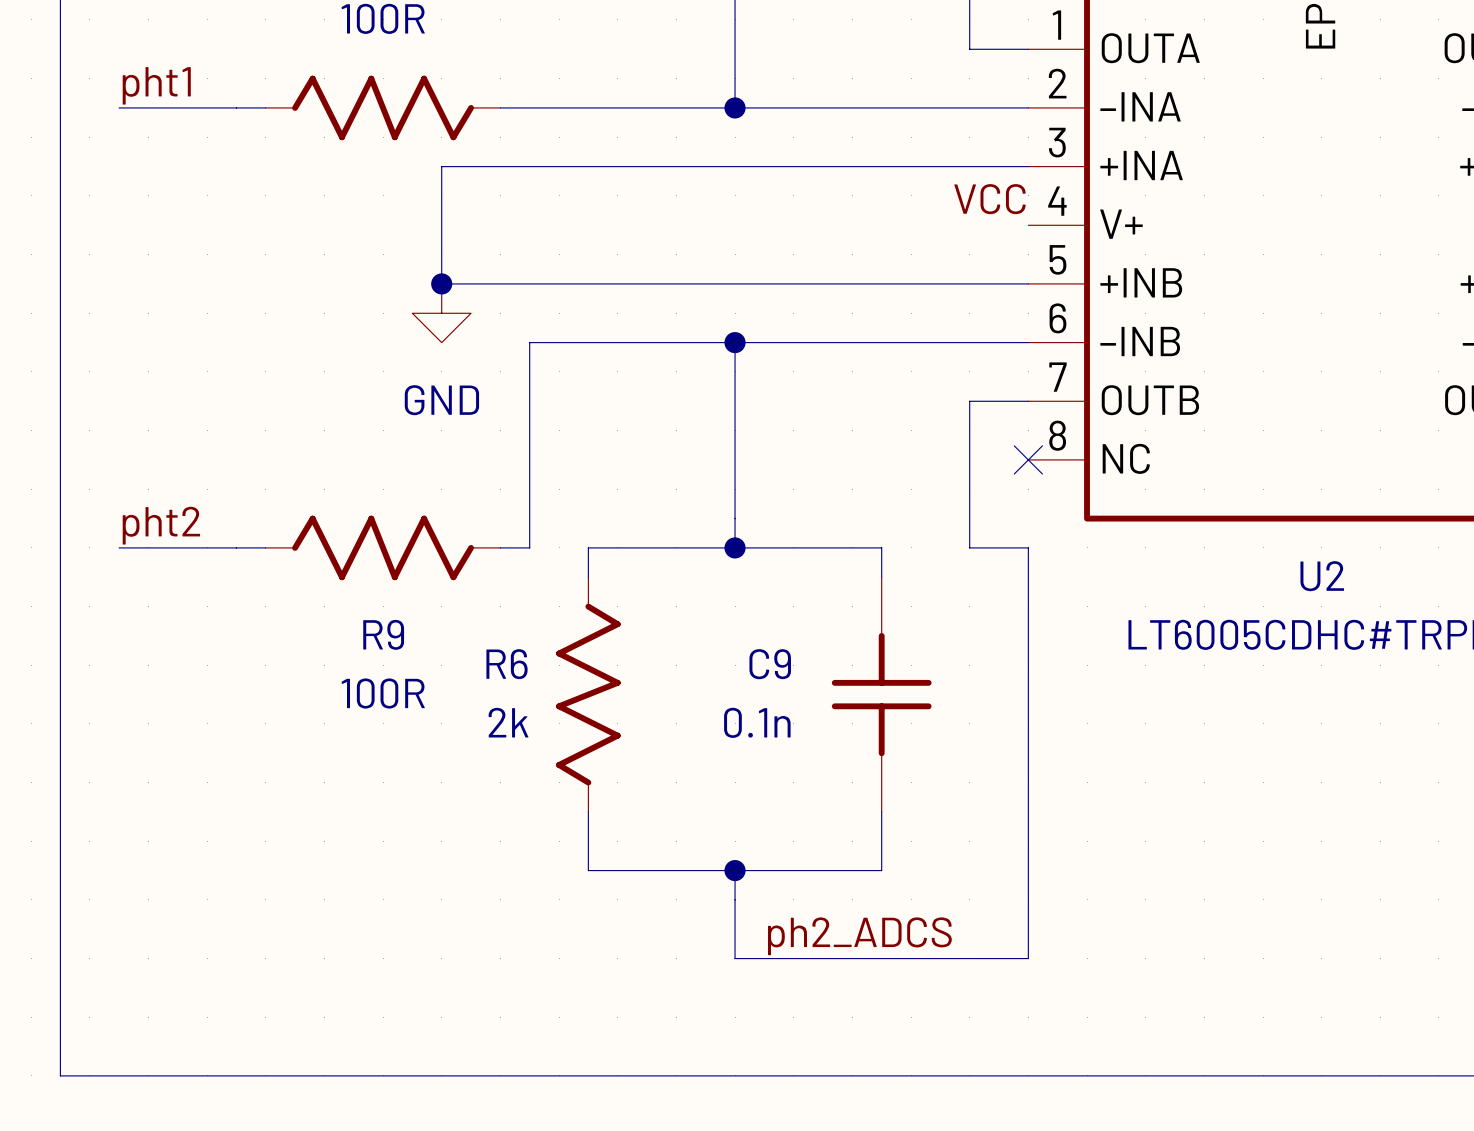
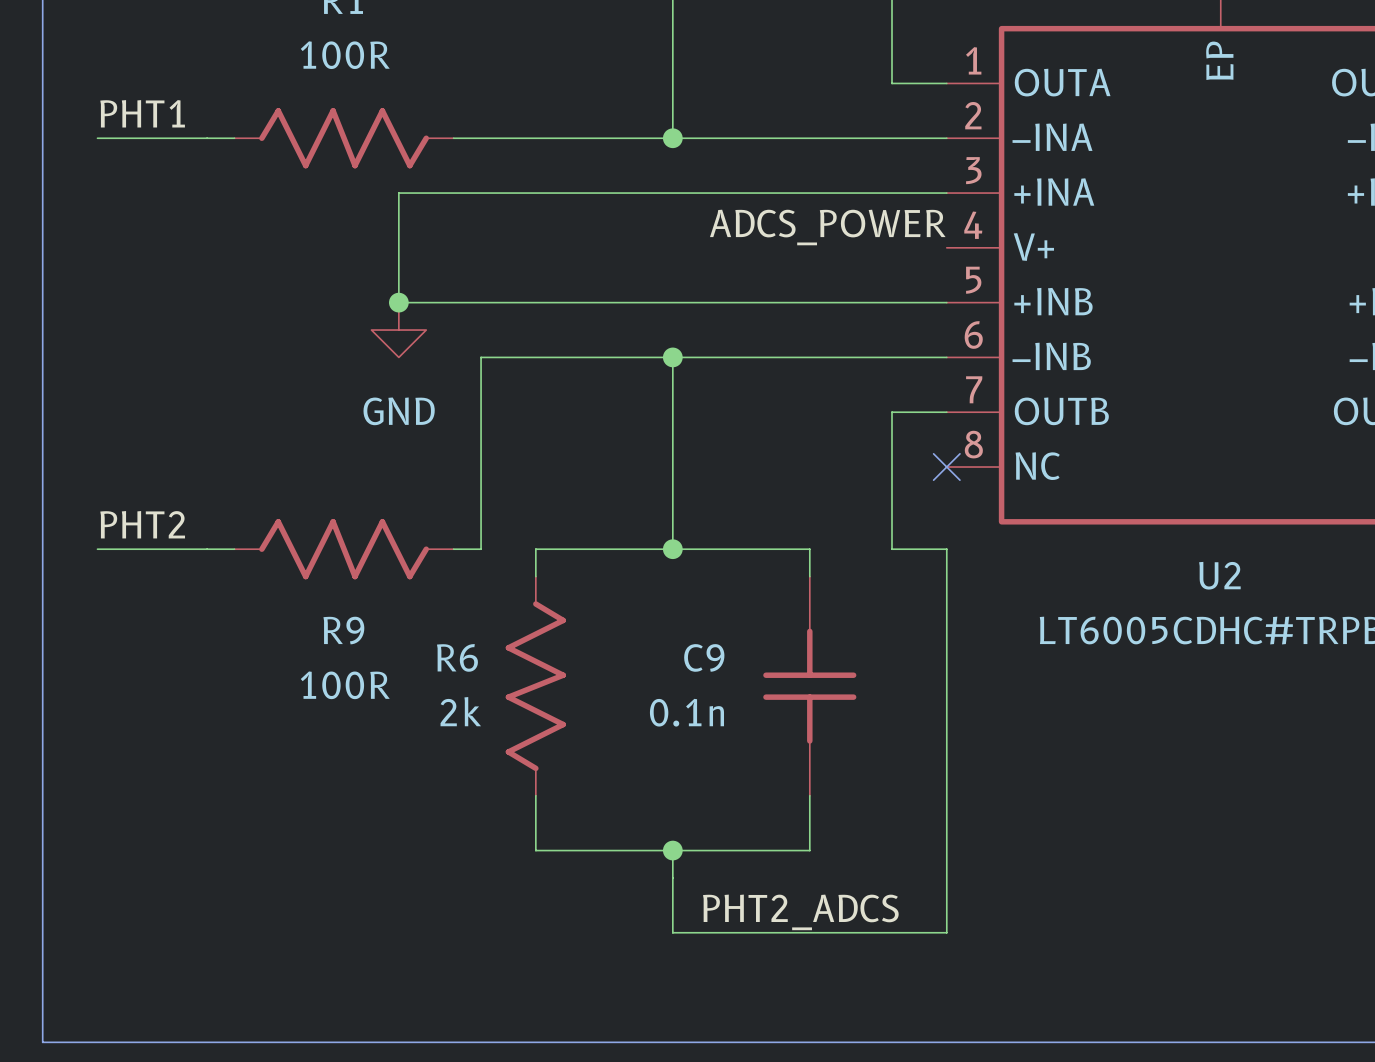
label: pht1 (156, 85) -> PHT1 (142, 113)
label: VCC (989, 199) -> ADCS_POWER (827, 227)
label: pht2 (161, 525) -> PHT2 (142, 524)
label: ph2_ADCS (859, 936) -> PHT2_ADCS (800, 912)

